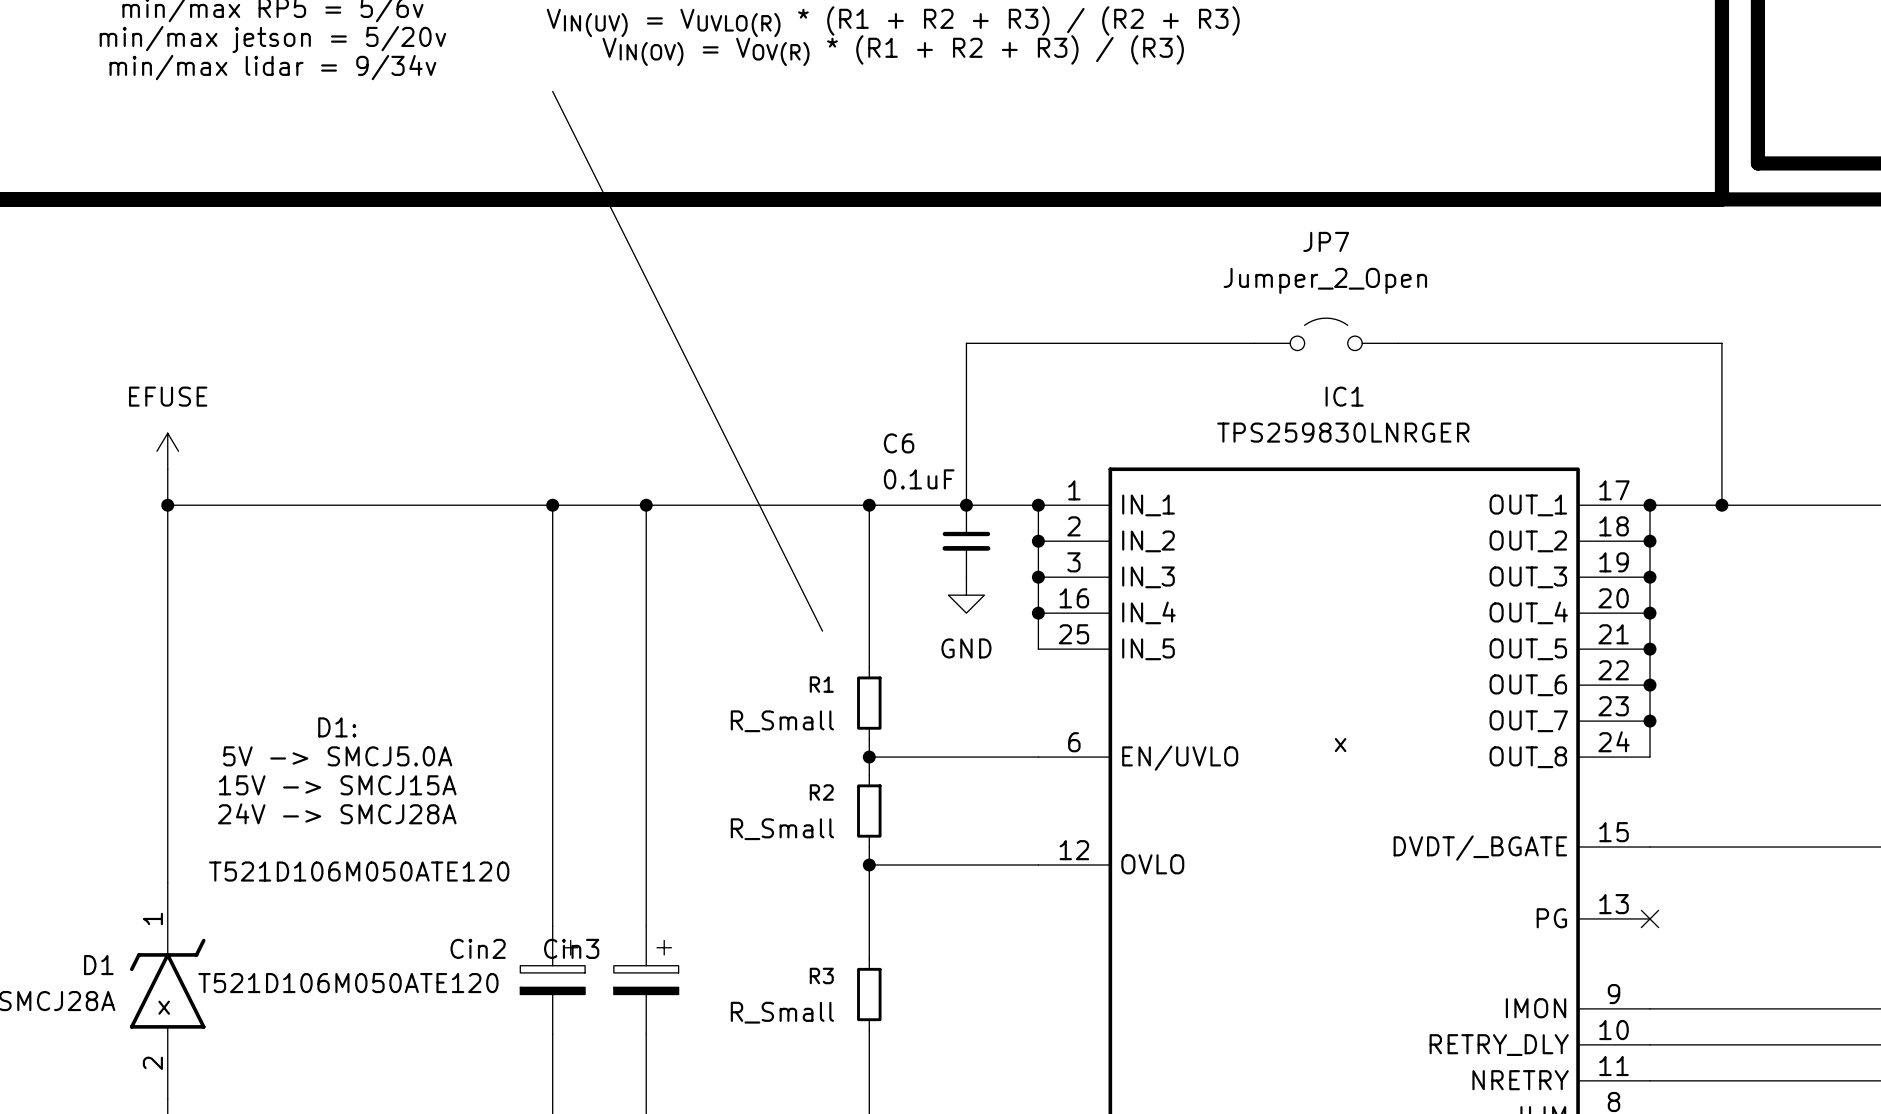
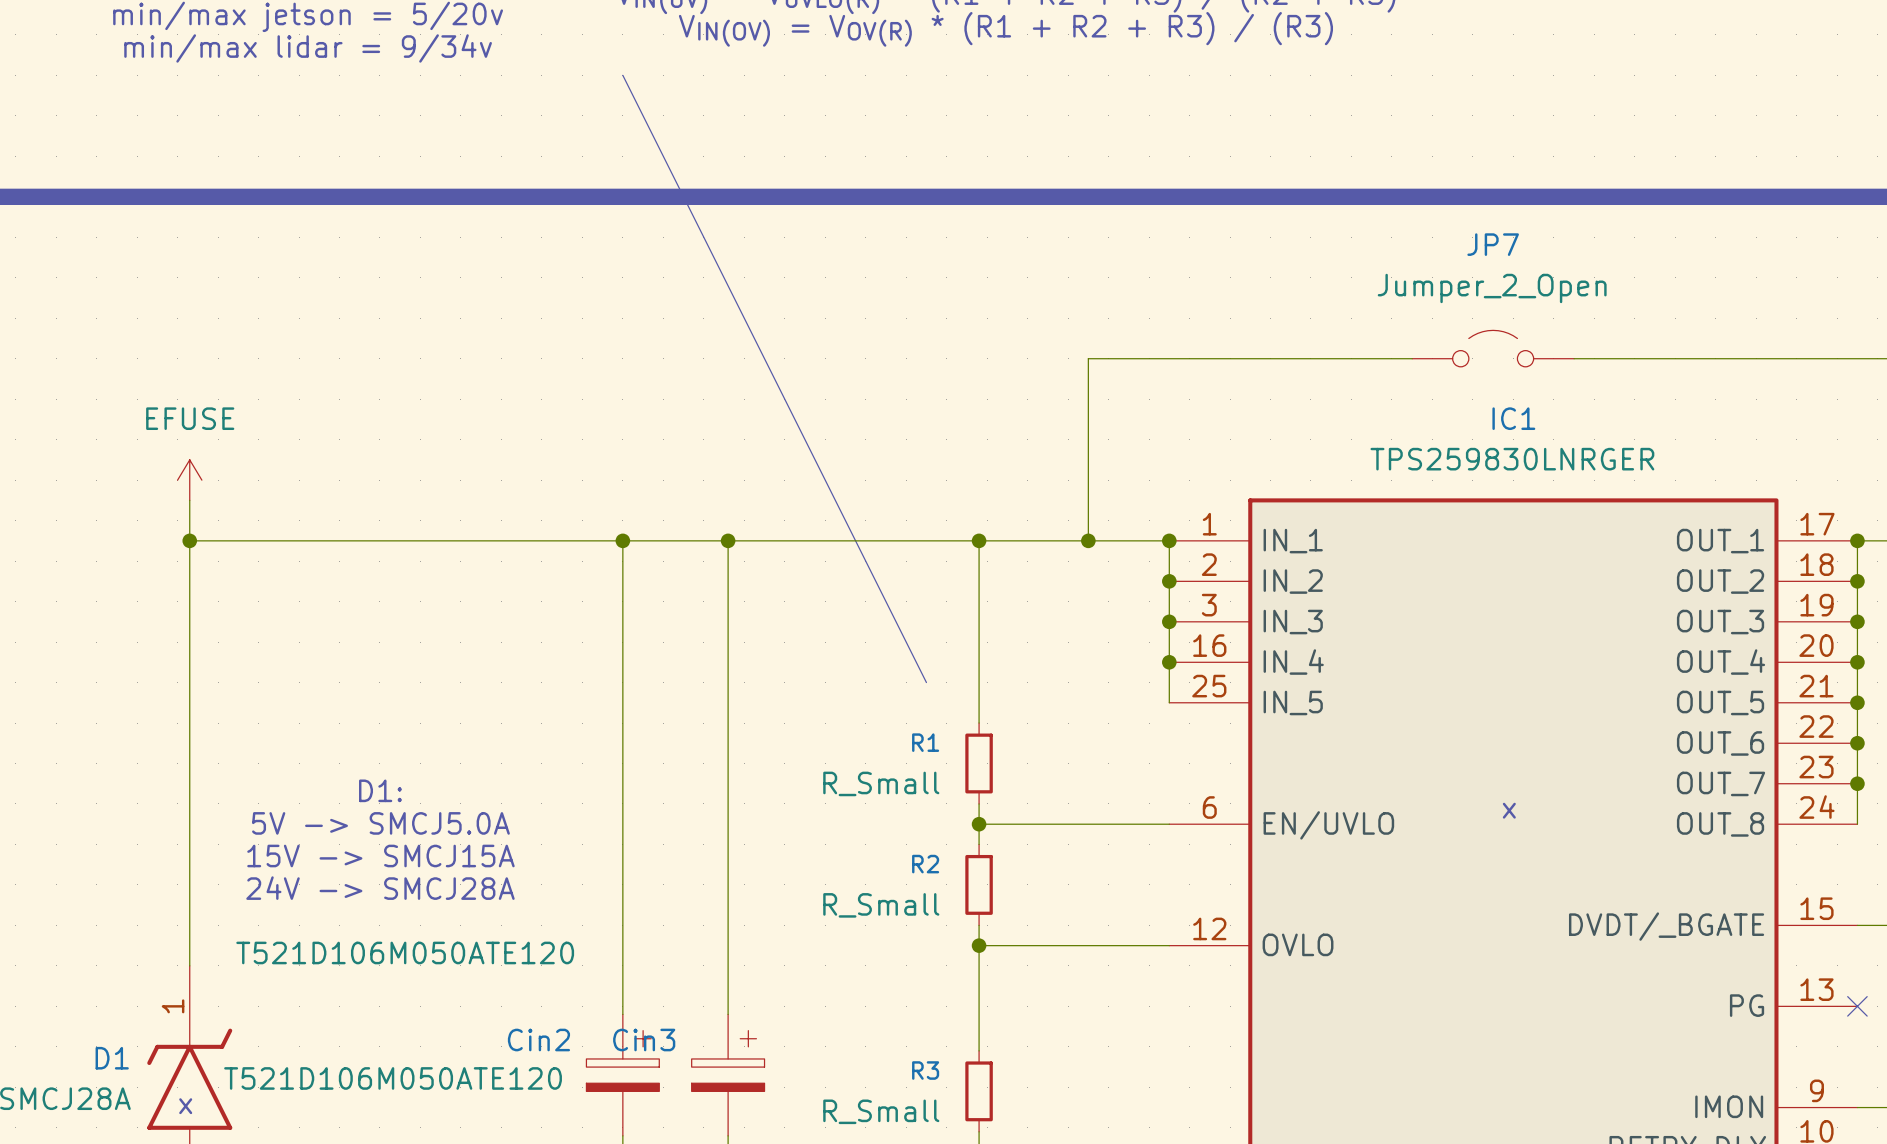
C6: 0.1uF (966, 541) -> none
power symbol: GND (966, 595) -> none

